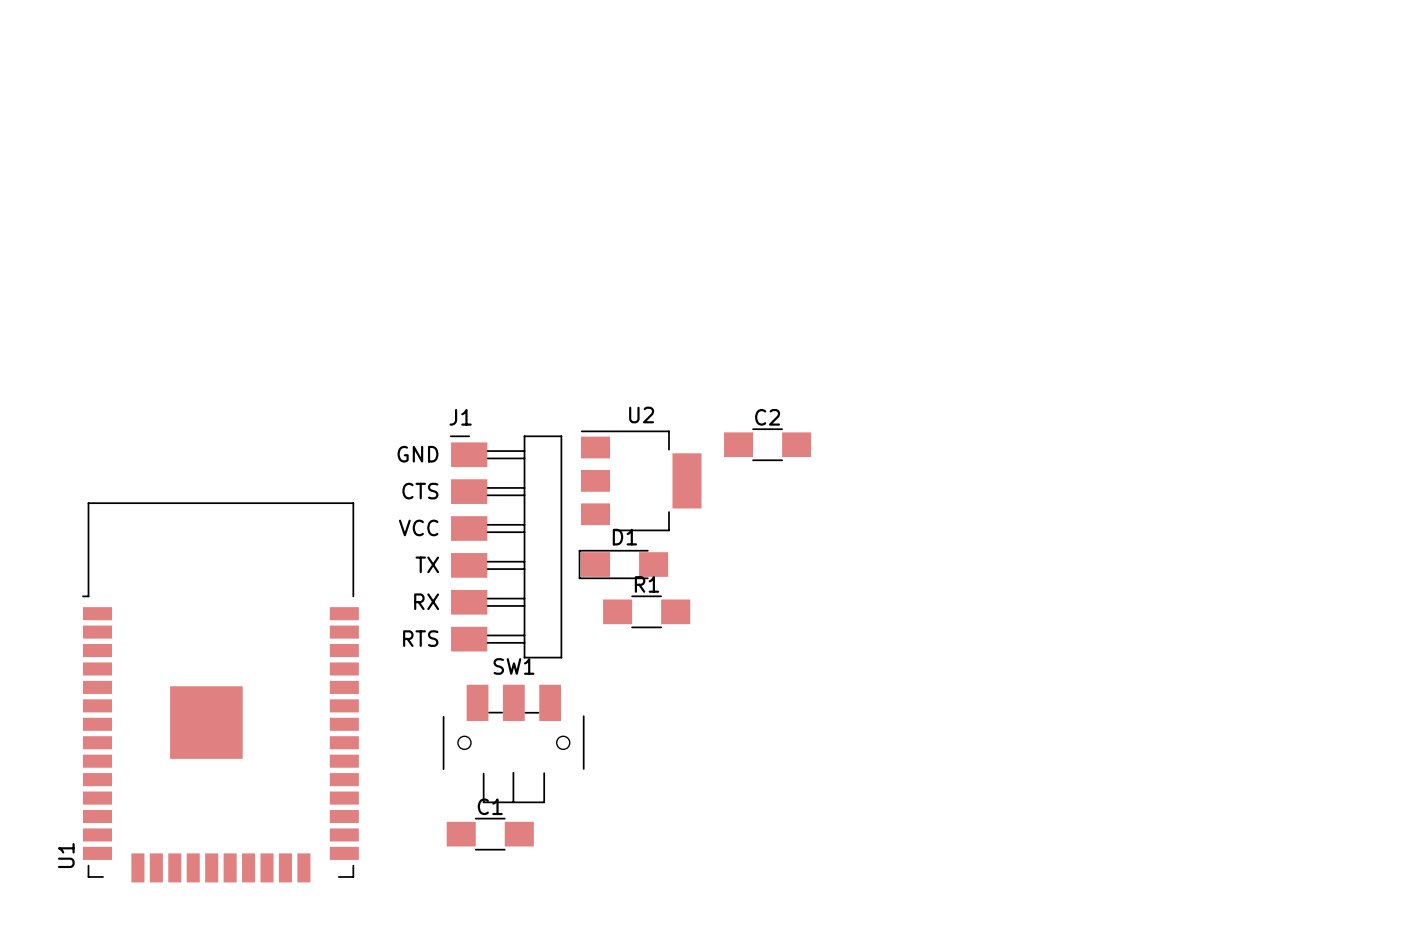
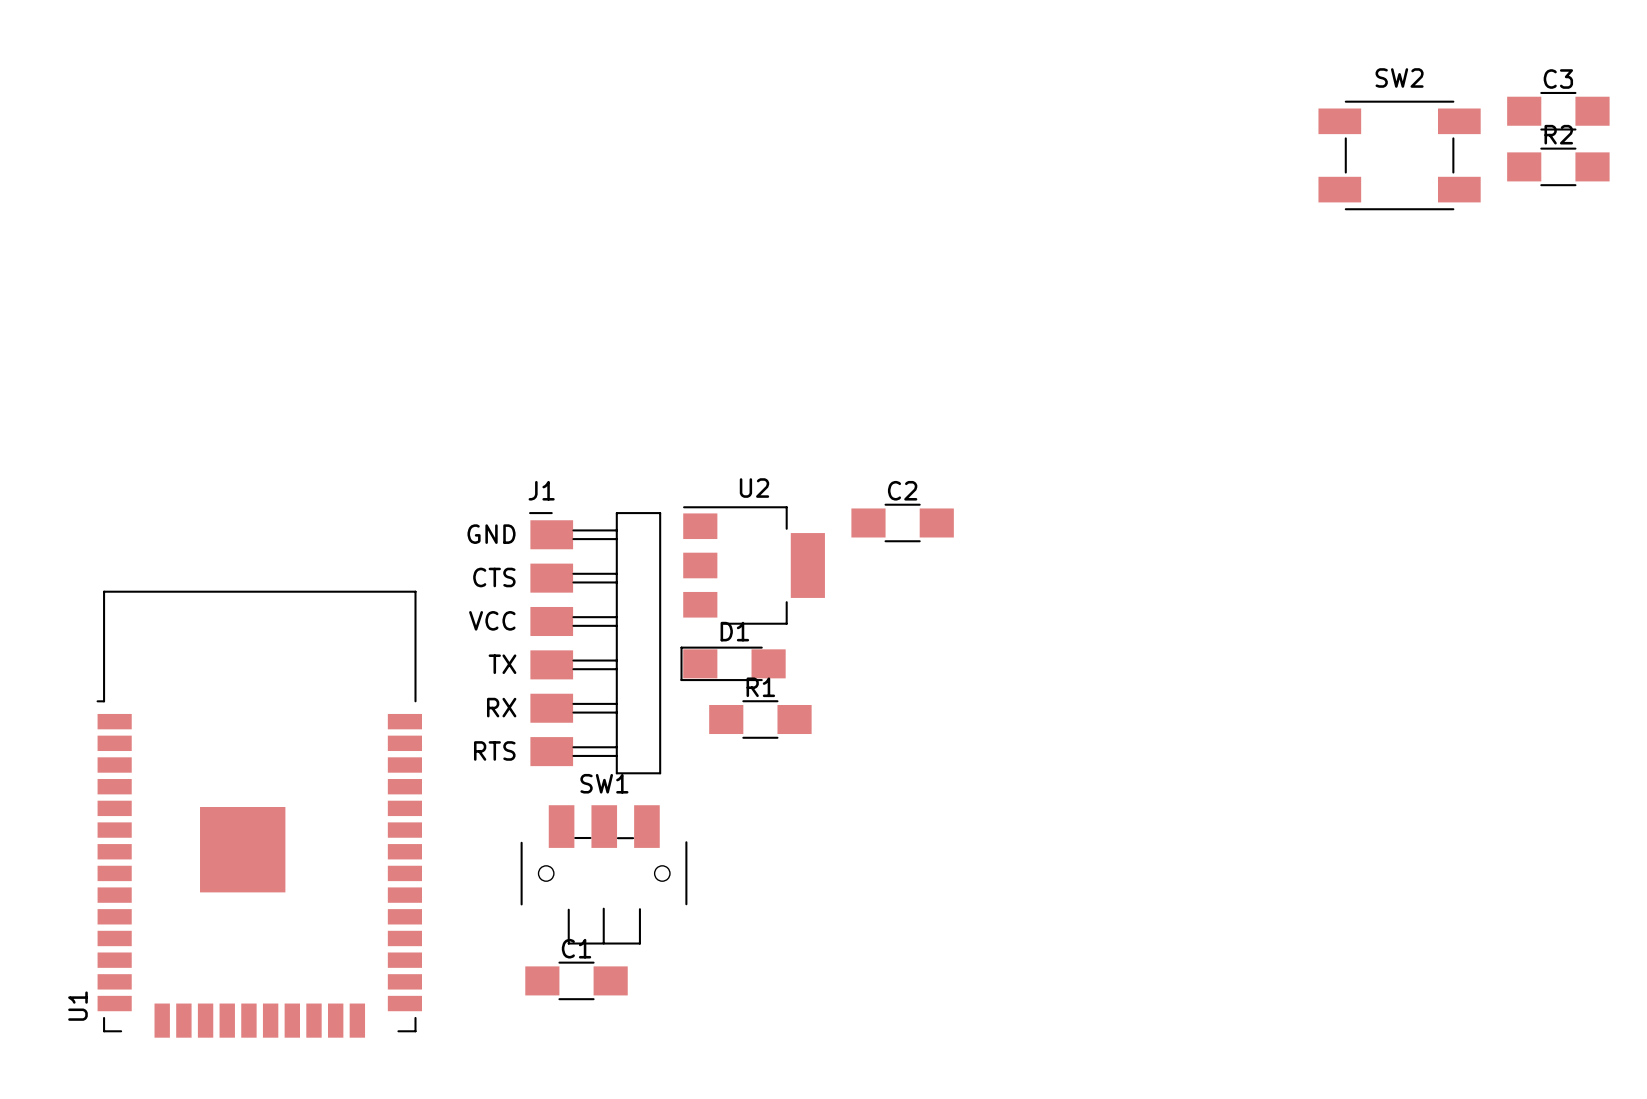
C3: none -> (1558, 111)
SW2: none -> (1399, 155)
R2: none -> (1558, 166)

